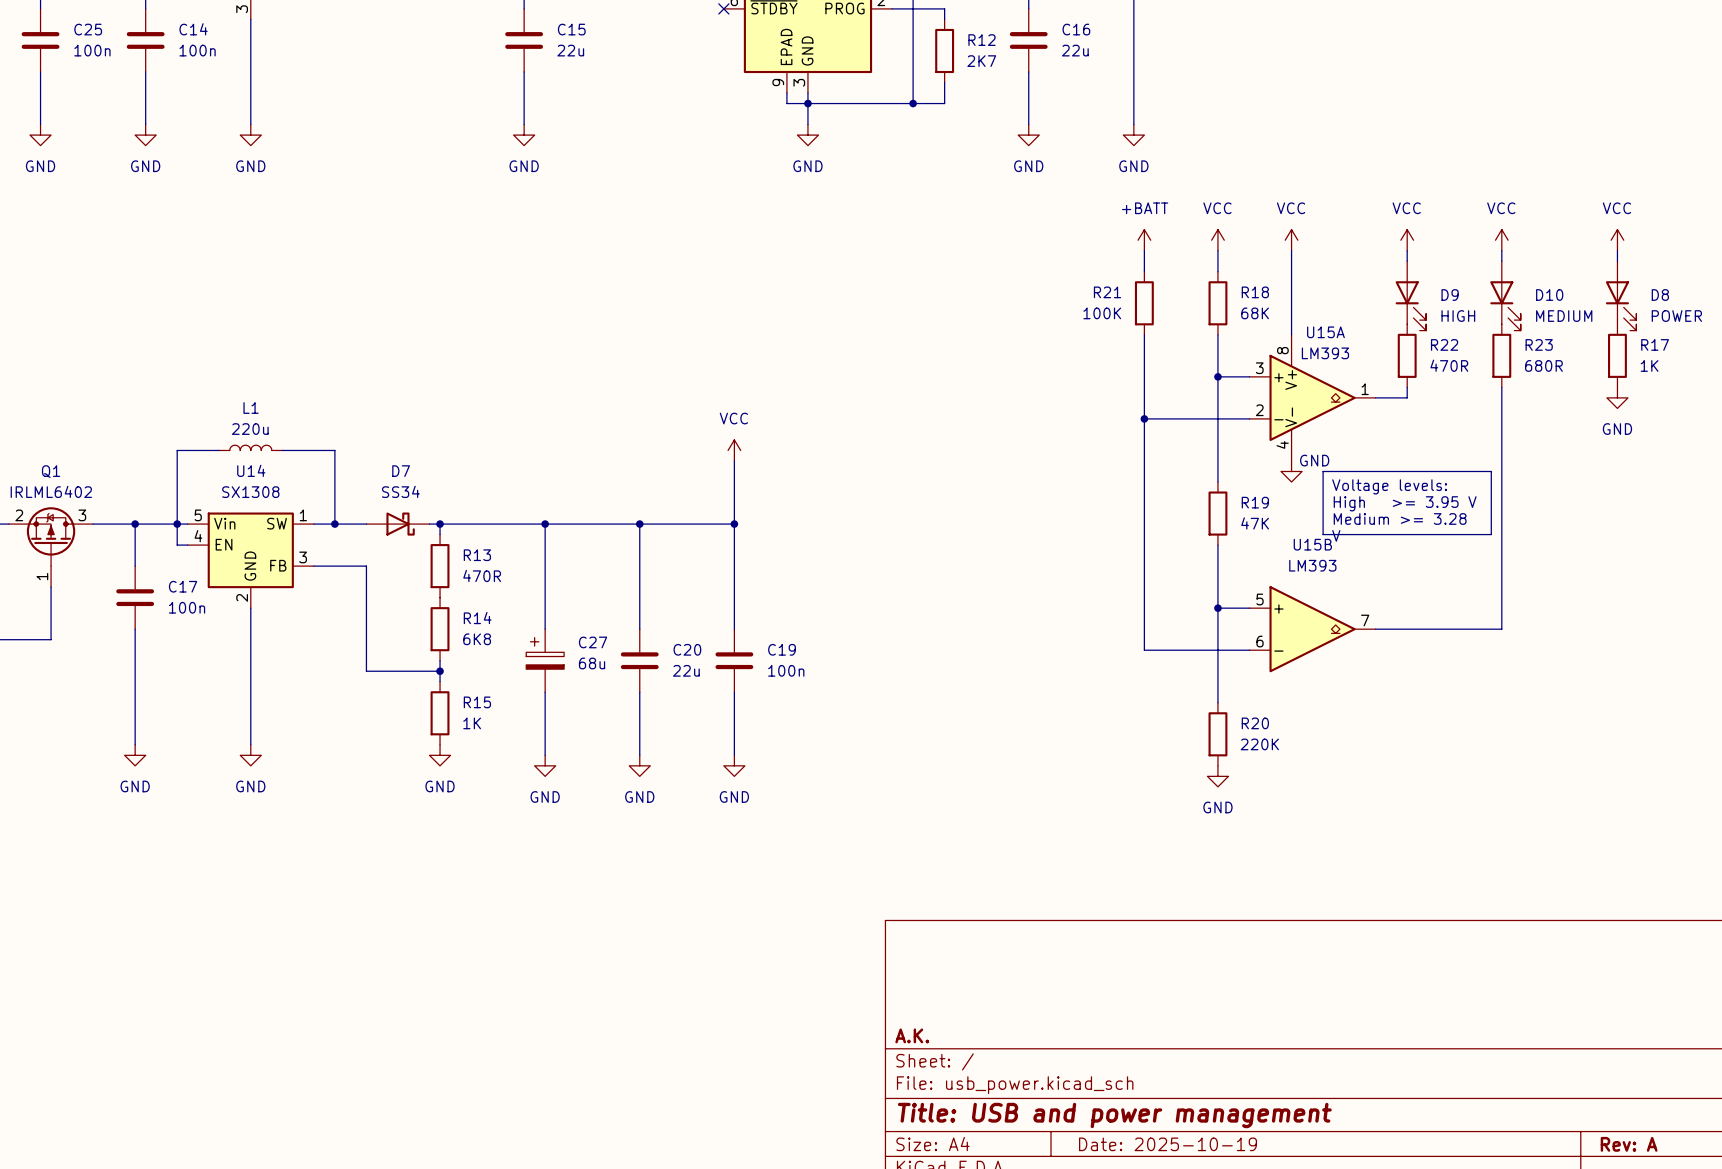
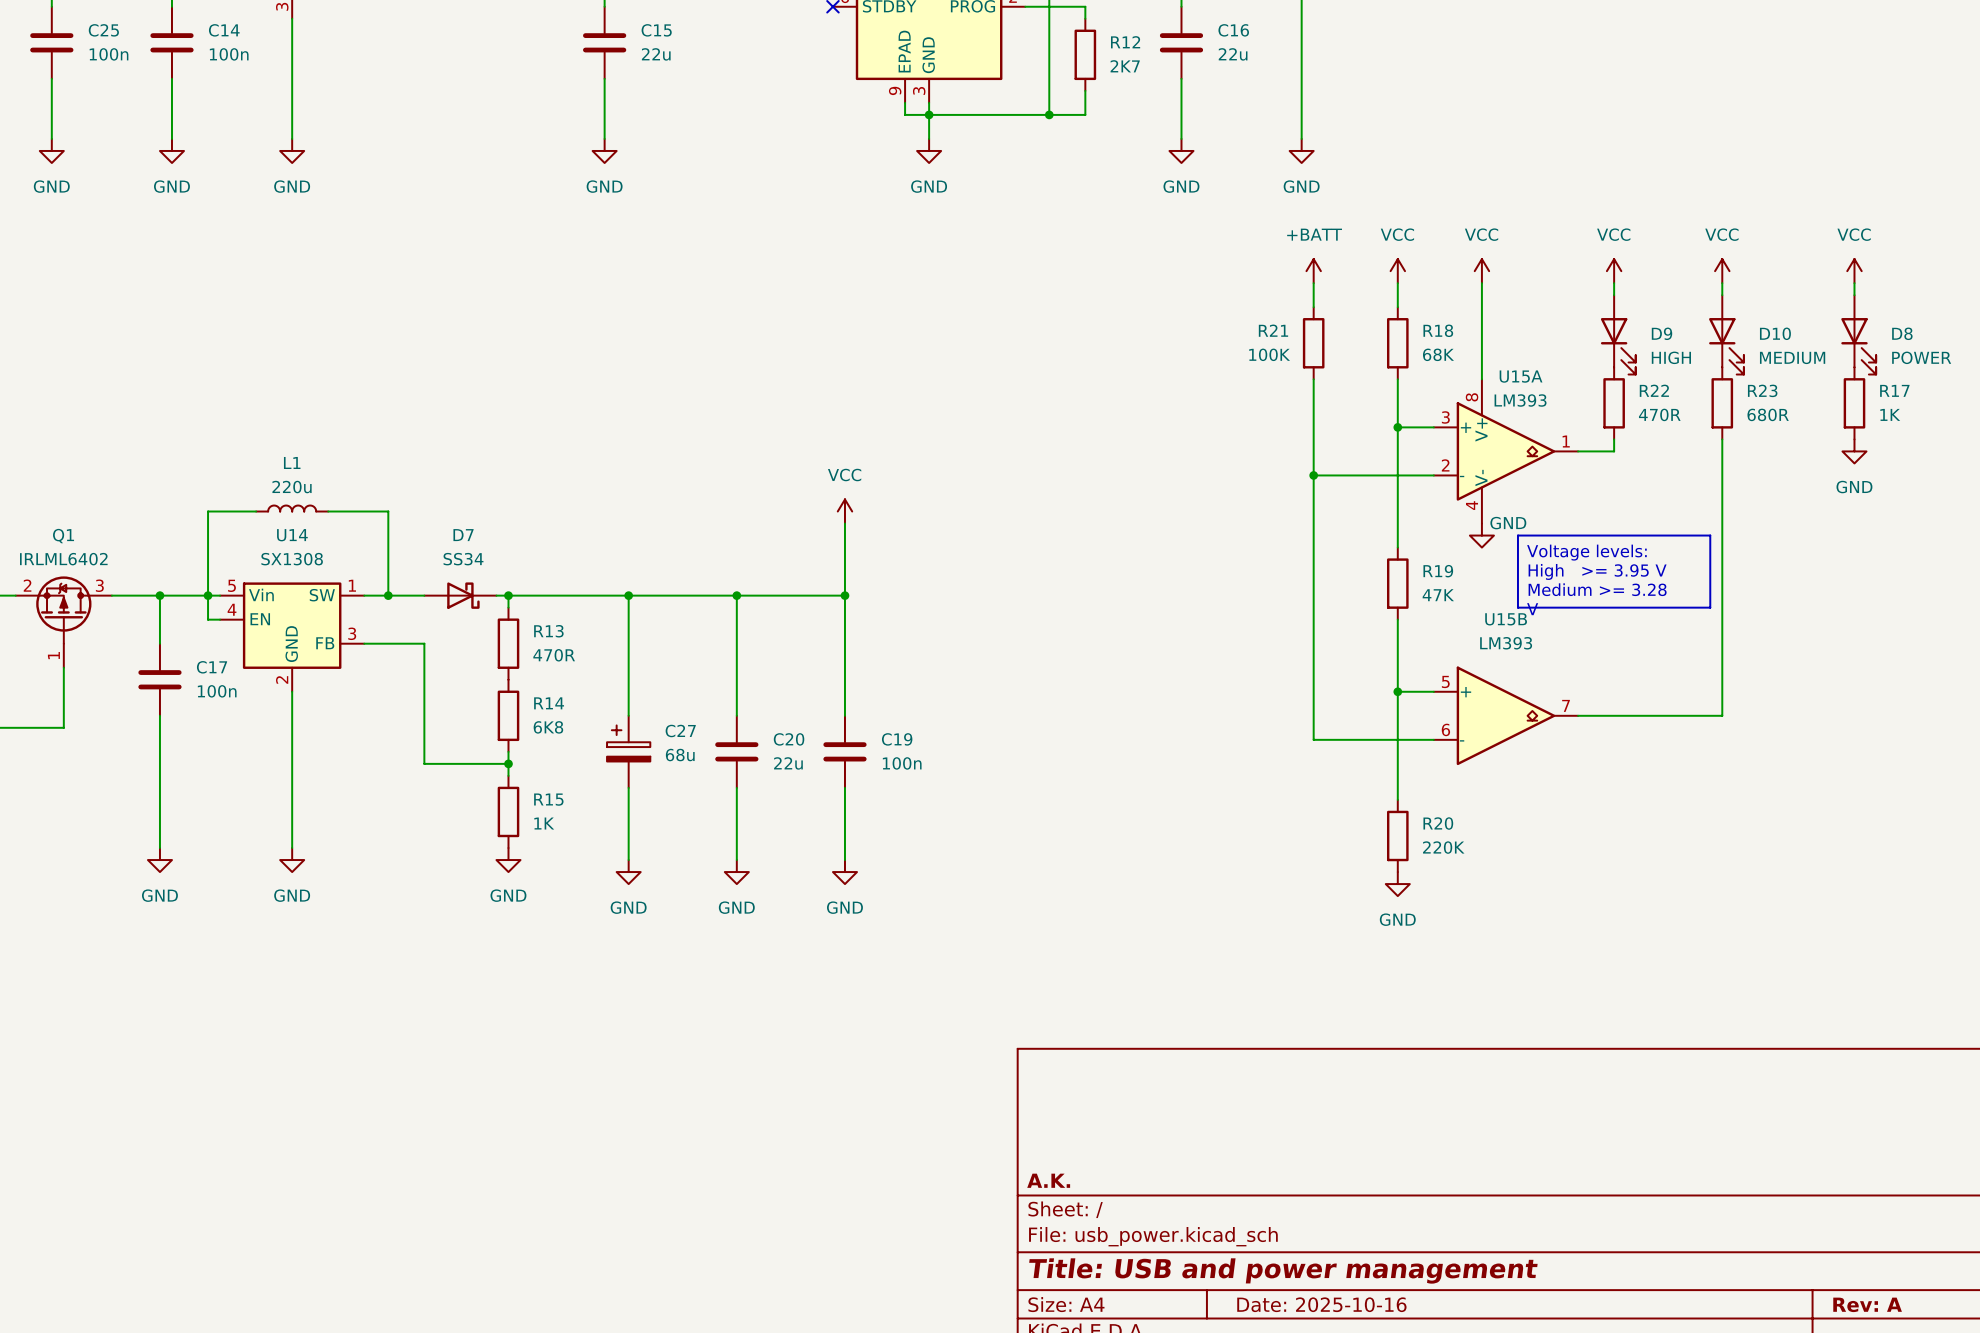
title block: Date: 2025-10-19 (1168, 1144) -> Date: 2025-10-16 (1321, 1304)

